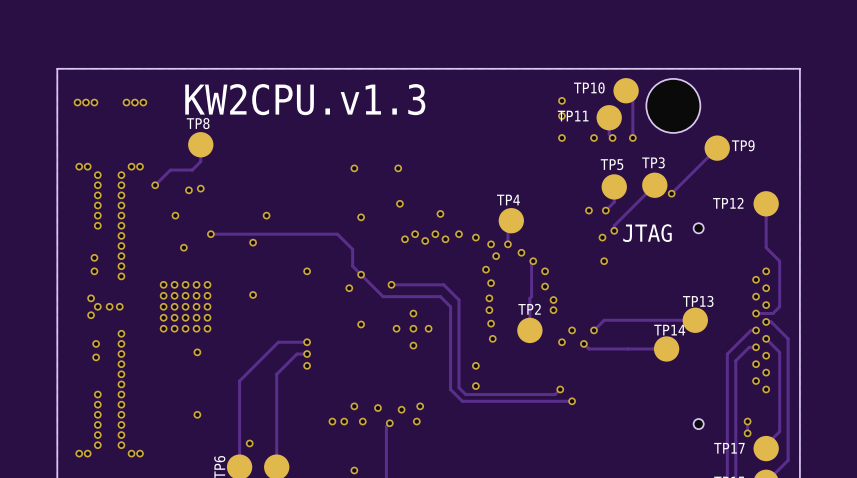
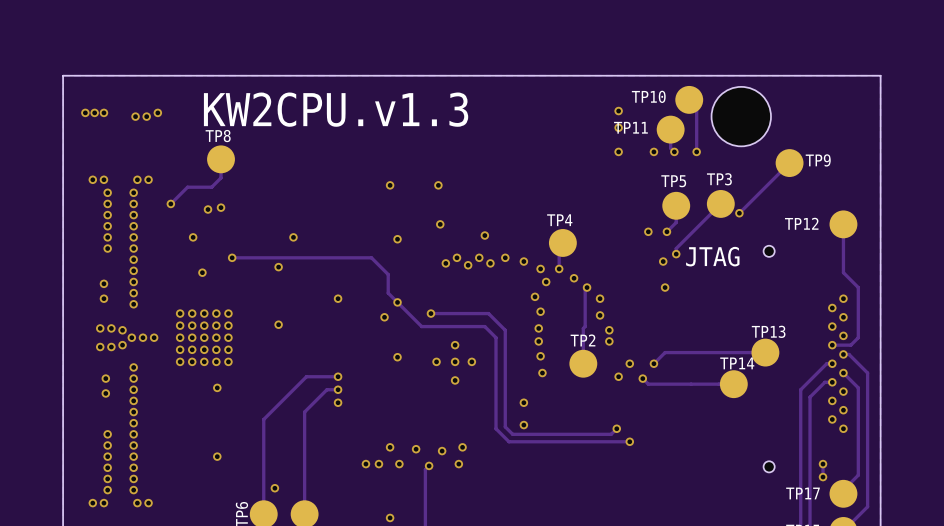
via: (126, 102) -> none
via: (134, 102) -> none
via: none -> (135, 116)
via: none -> (146, 116)
via: none -> (92, 179)
via: none -> (103, 179)
via: none -> (137, 179)
via: none -> (148, 179)
via: (79, 166) -> none
via: (87, 166) -> none
via: (131, 166) -> none
via: (140, 166) -> none
via: none -> (111, 328)
via: none -> (122, 330)
via: (97, 306) -> none
via: (109, 306) -> none
via: none -> (142, 337)
via: none -> (154, 337)
via: none -> (122, 345)
via: none -> (111, 347)
via: (79, 453) -> none
via: (87, 453) -> none
via: (131, 453) -> none
via: (140, 453) -> none
via: none -> (92, 503)
via: none -> (103, 503)
via: none -> (137, 503)
via: none -> (148, 503)

